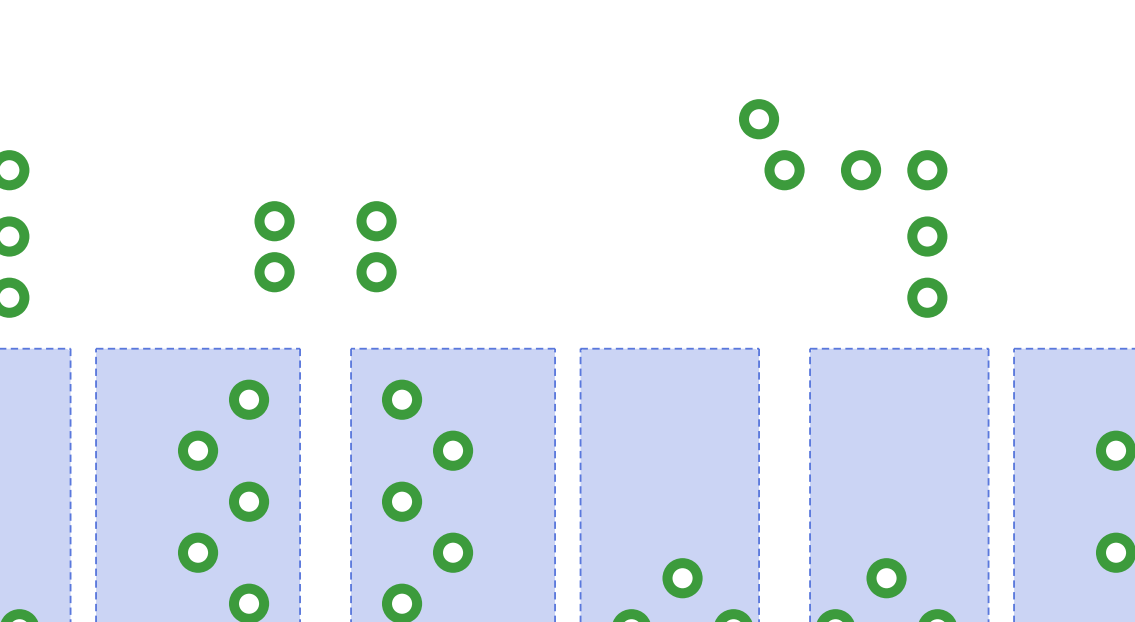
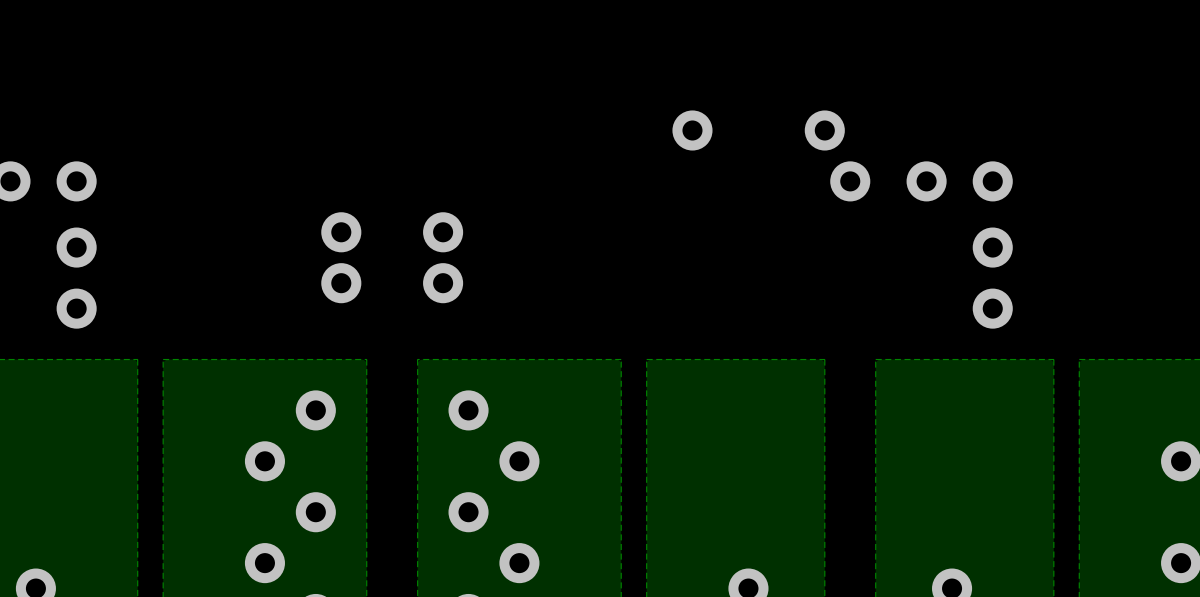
via: none -> (692, 130)

